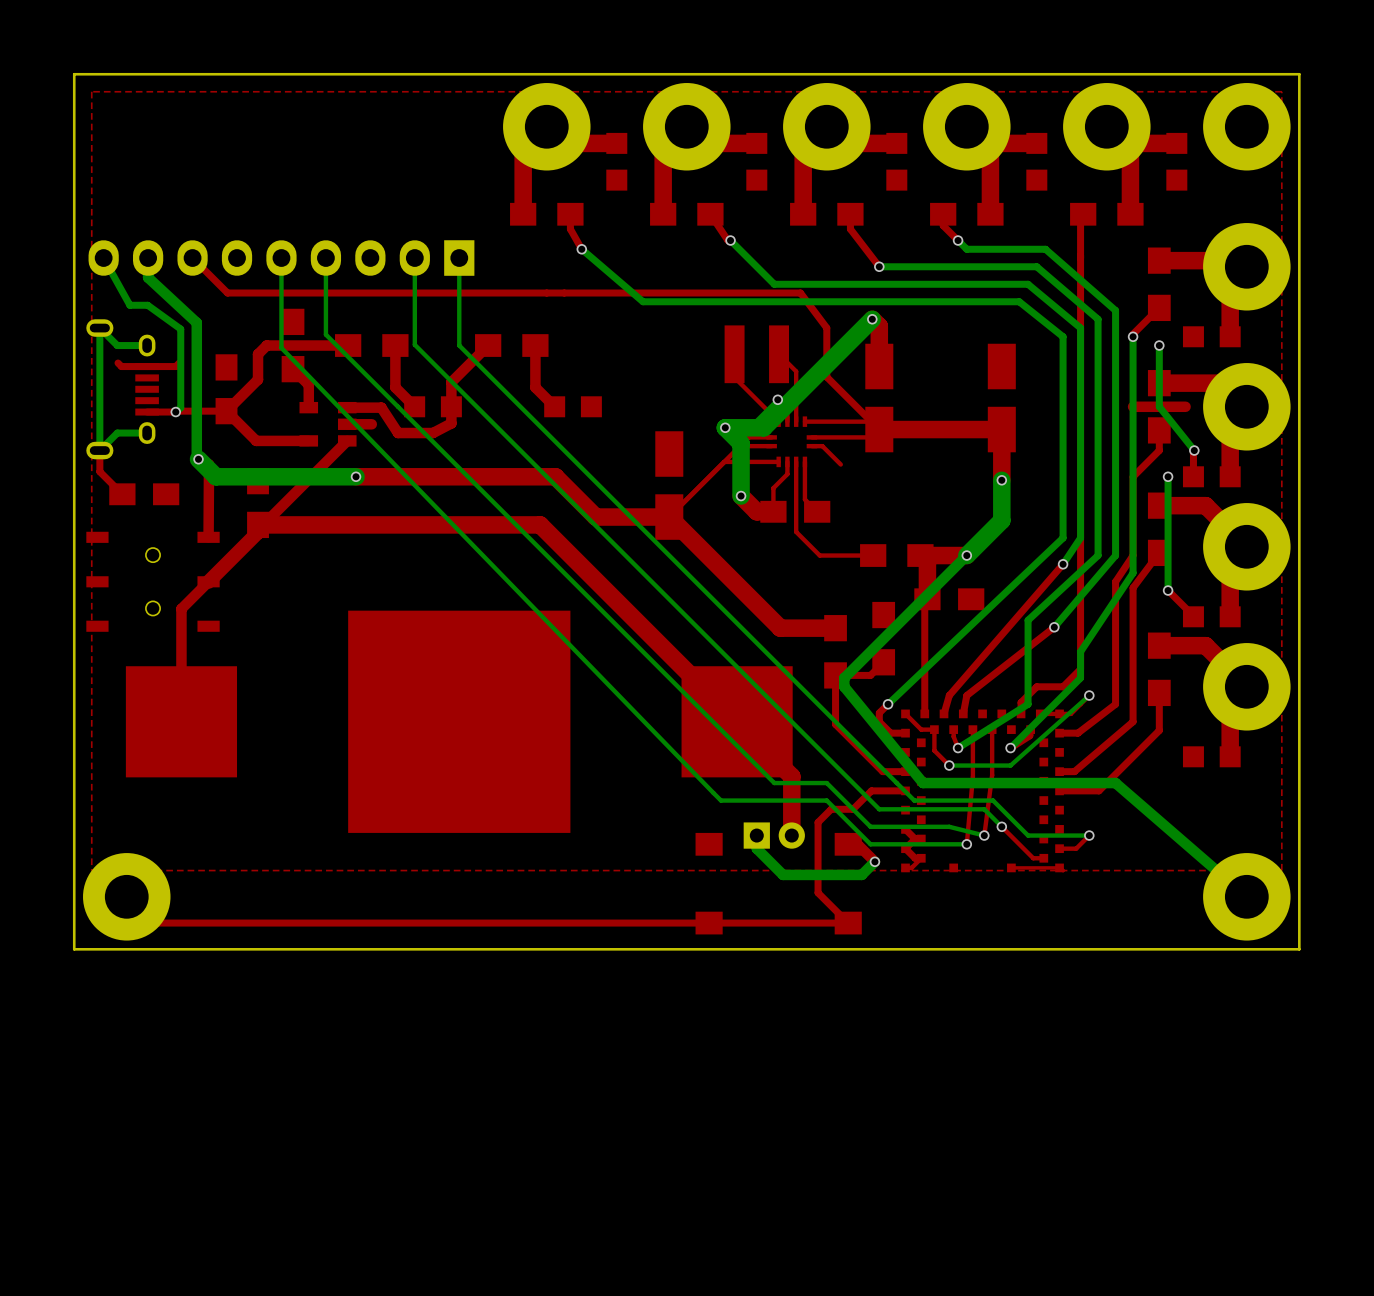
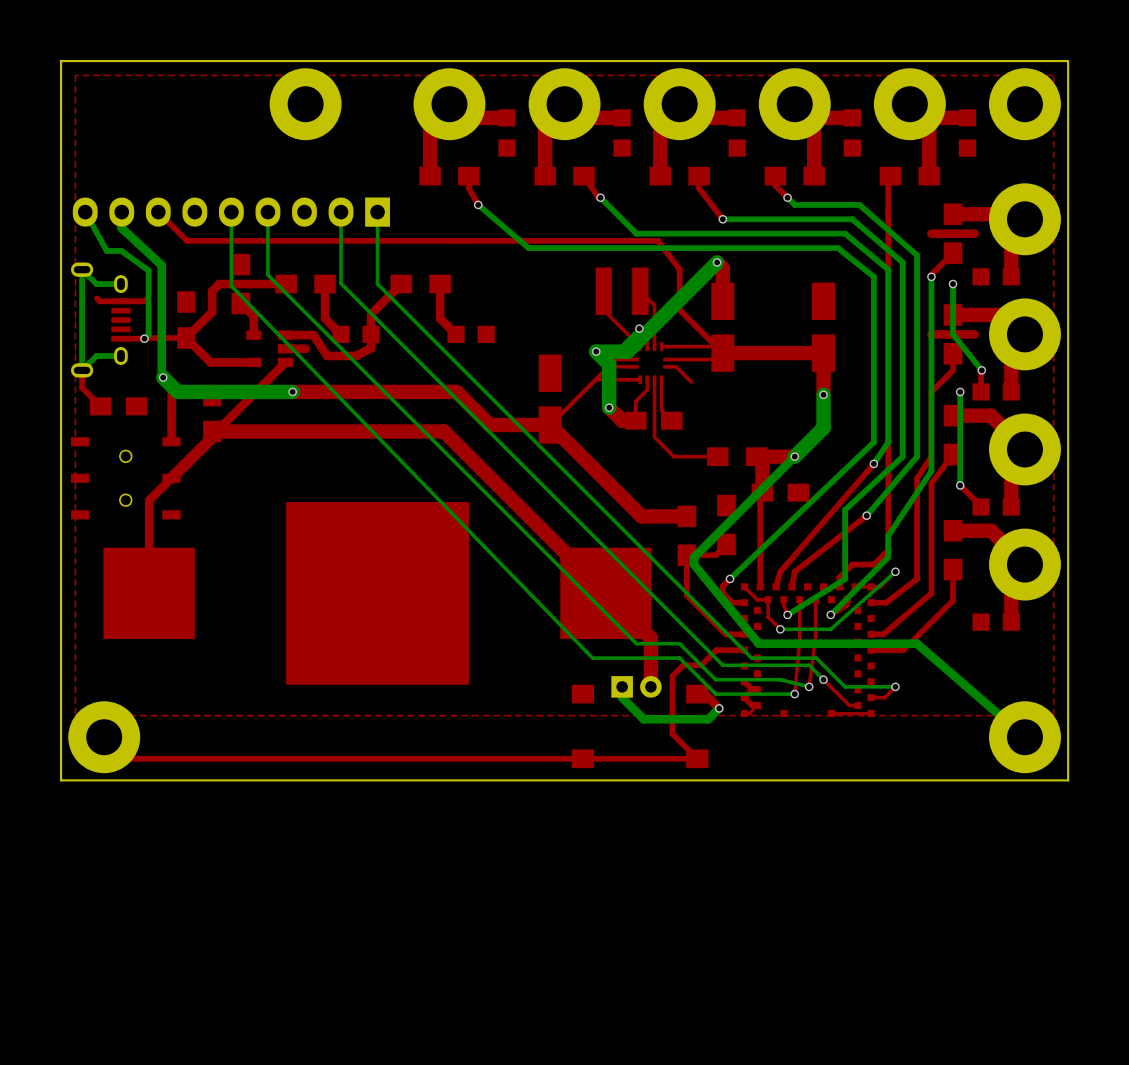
part: none -> (305, 104)
top track: none -> (974, 233) (931, 233)

